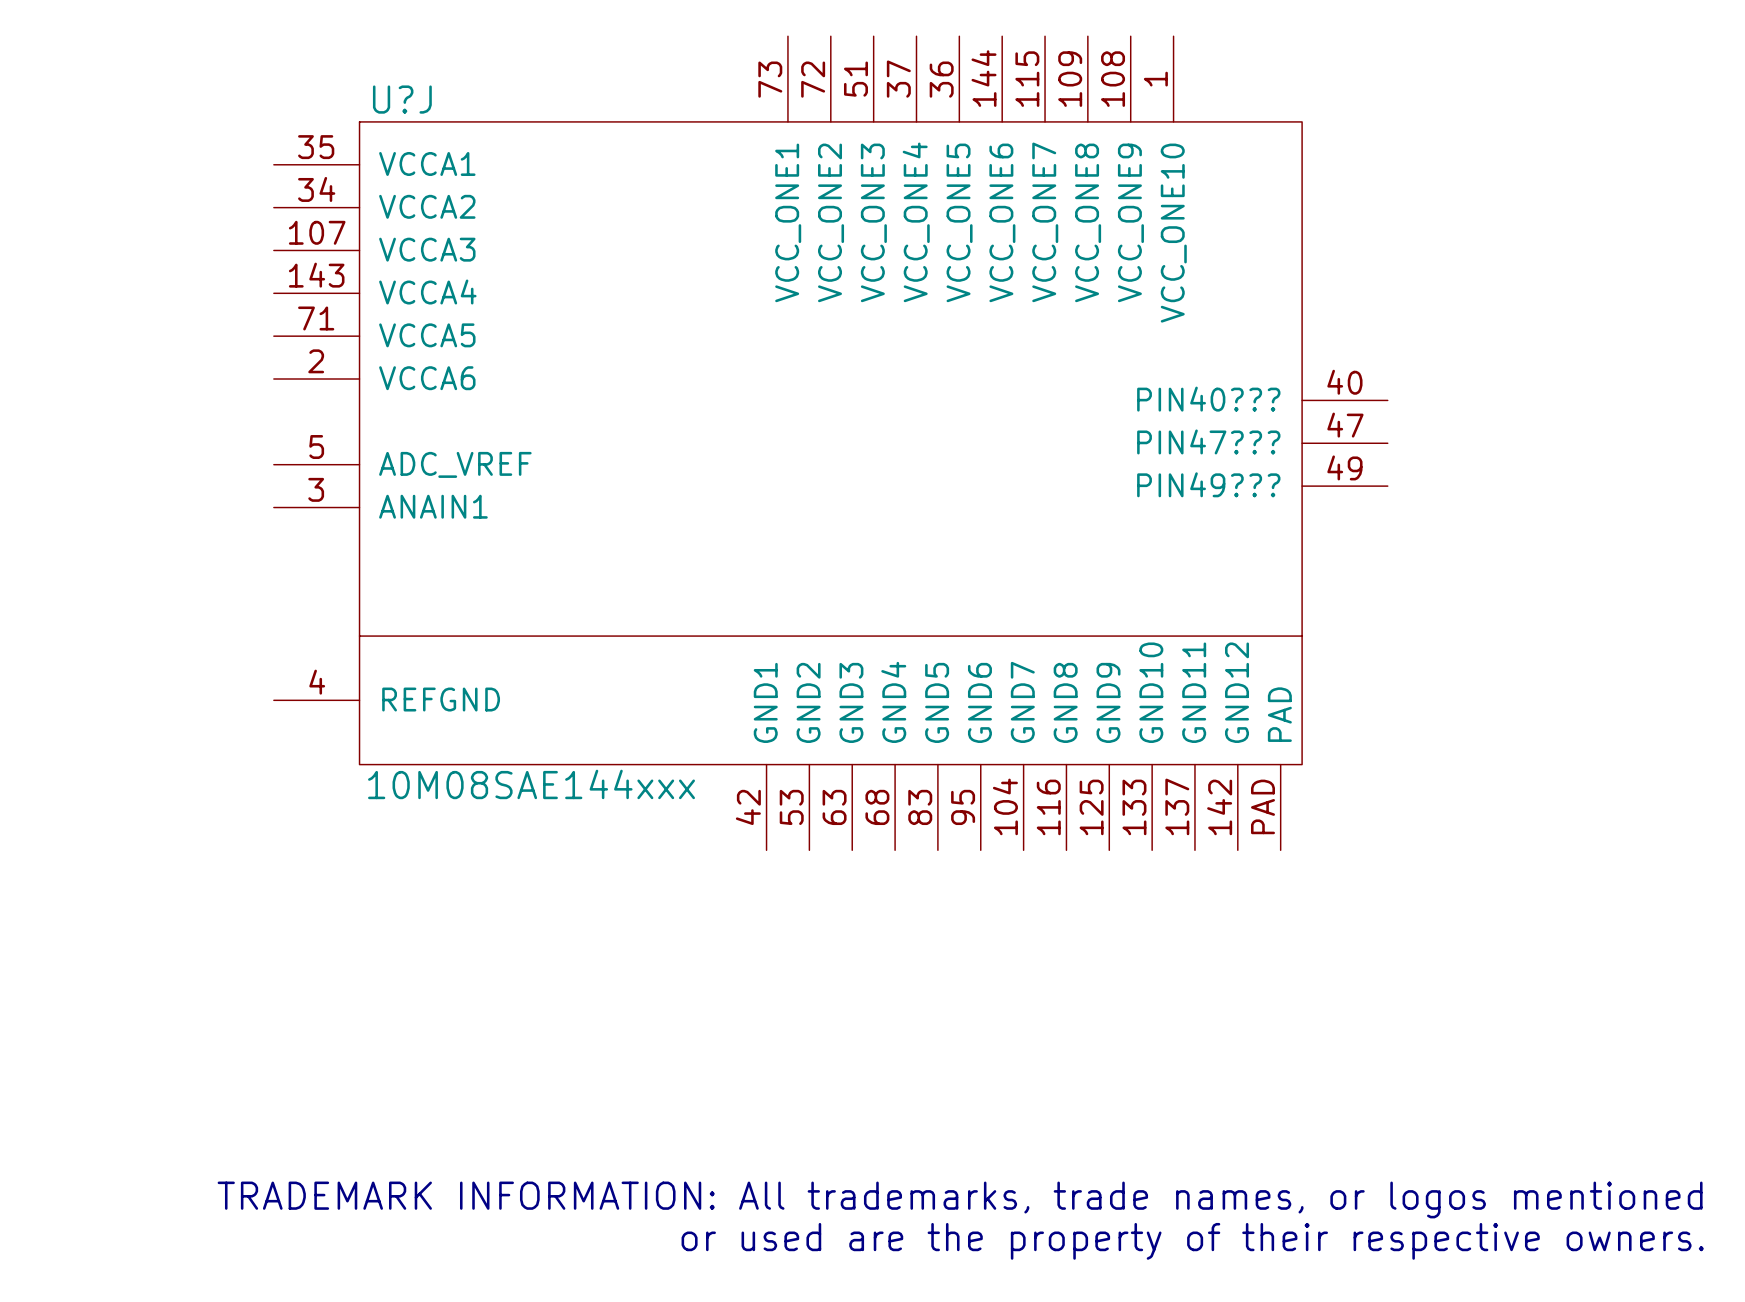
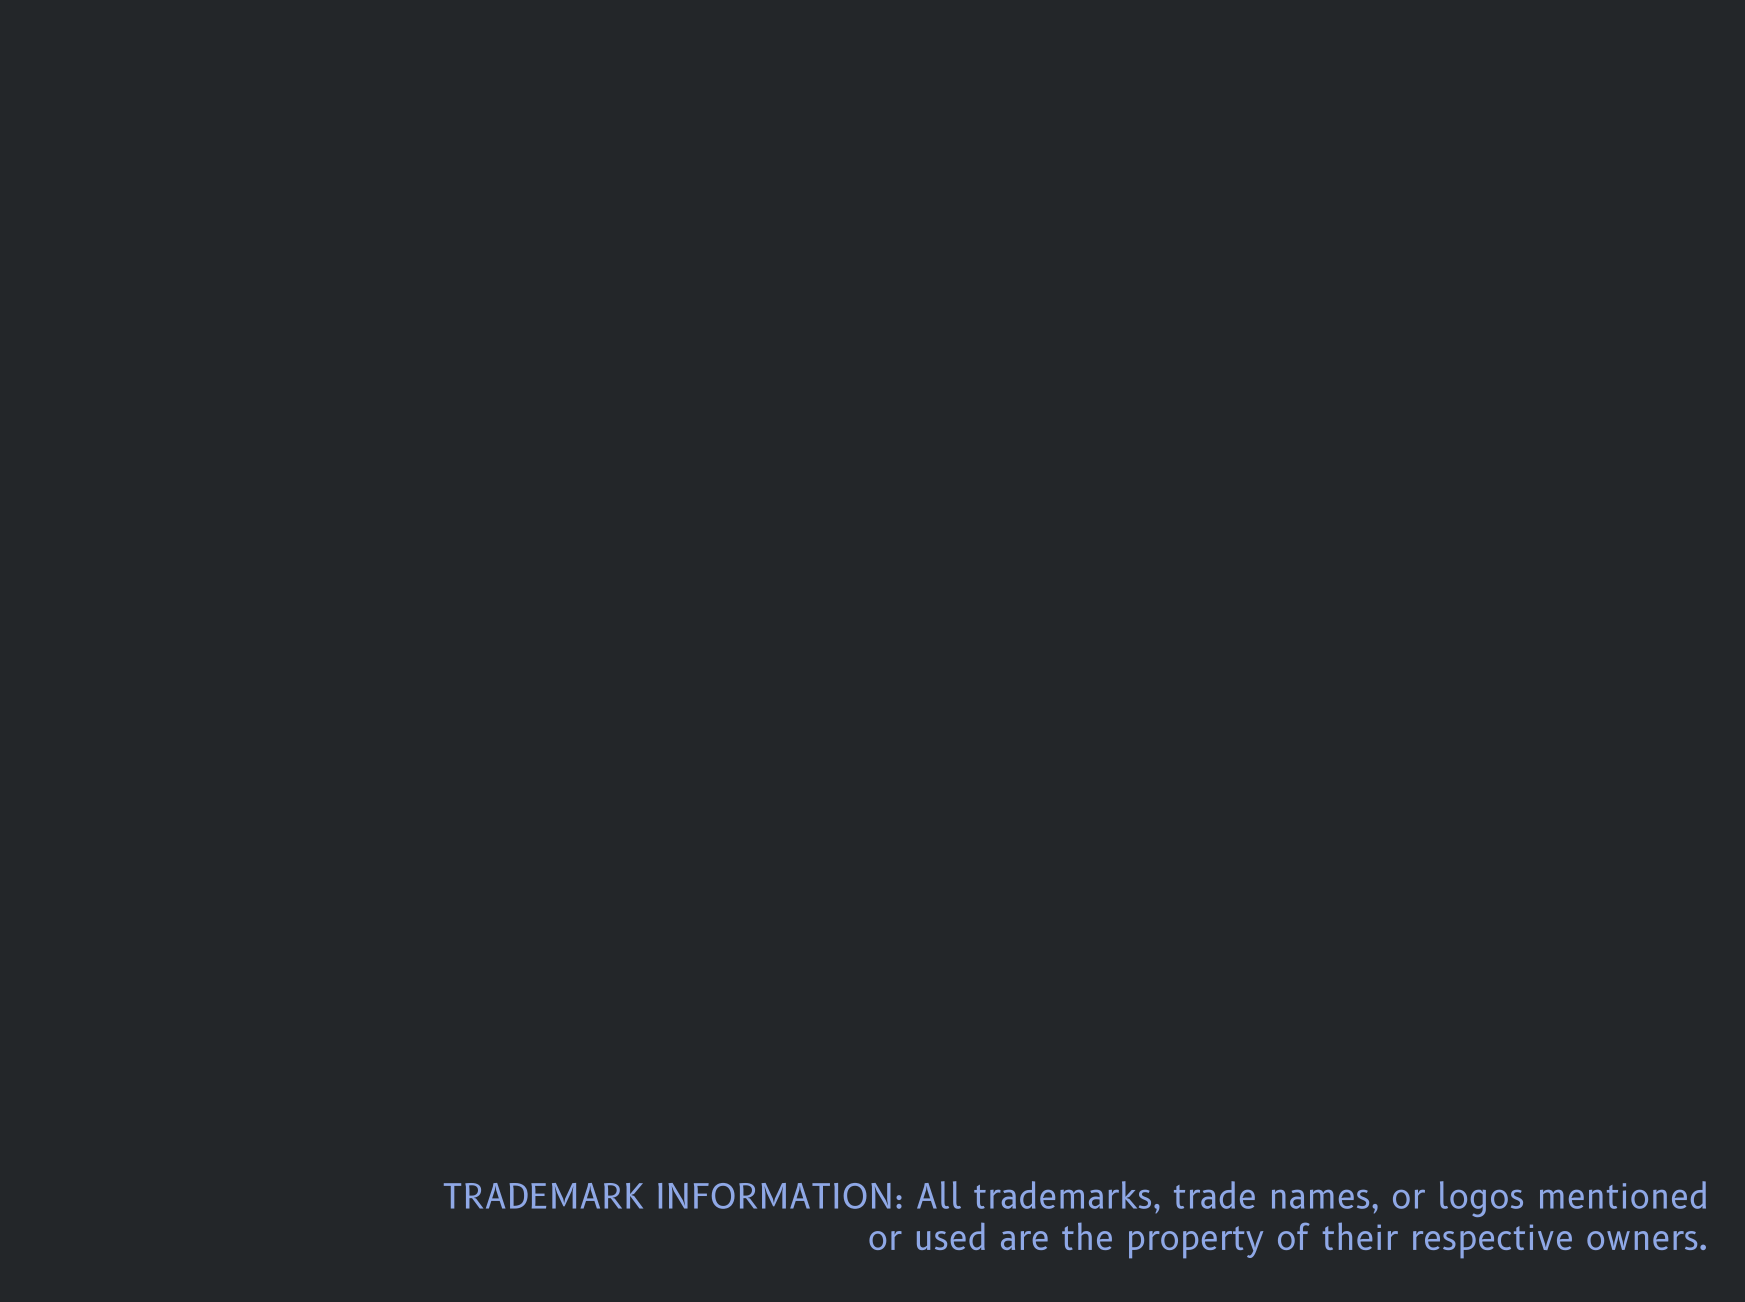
U?J: 10M08SAE144xxx (830, 443) -> none

